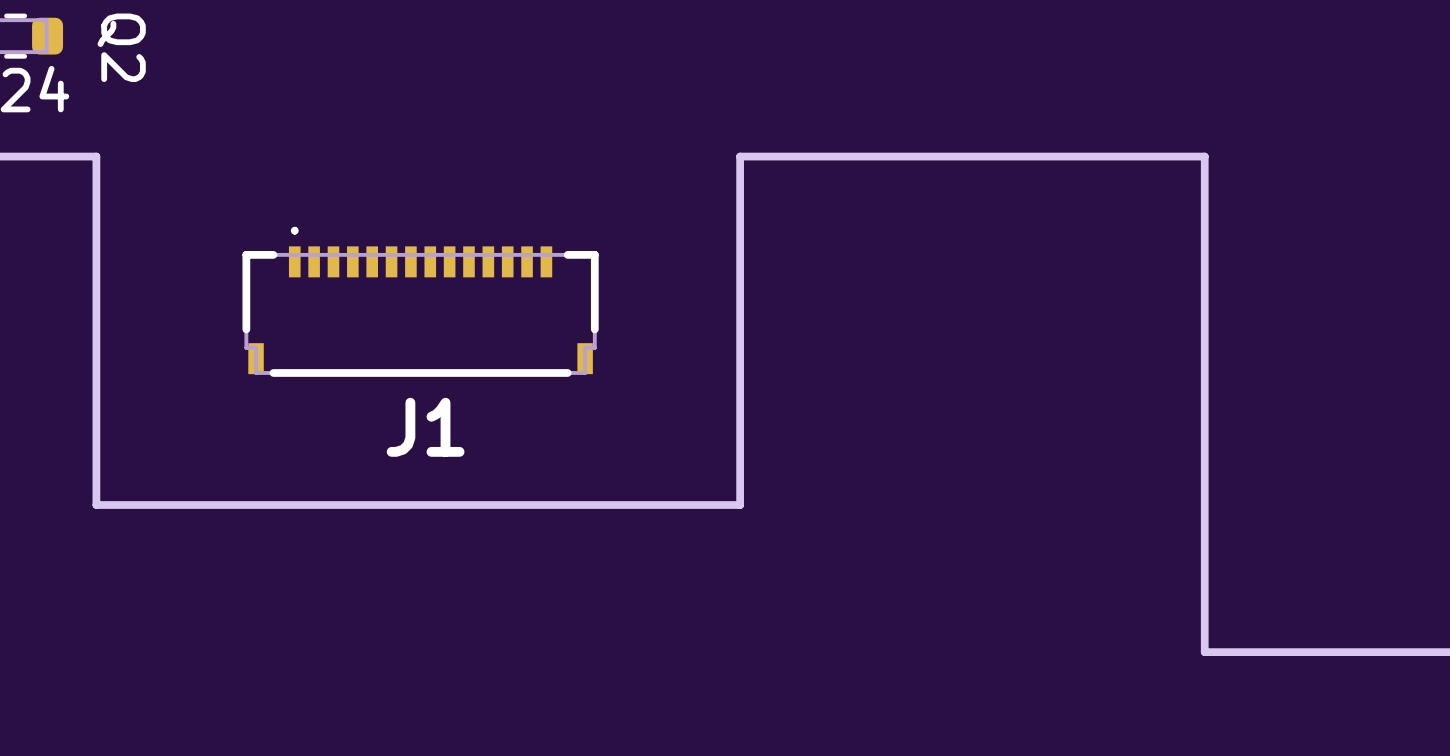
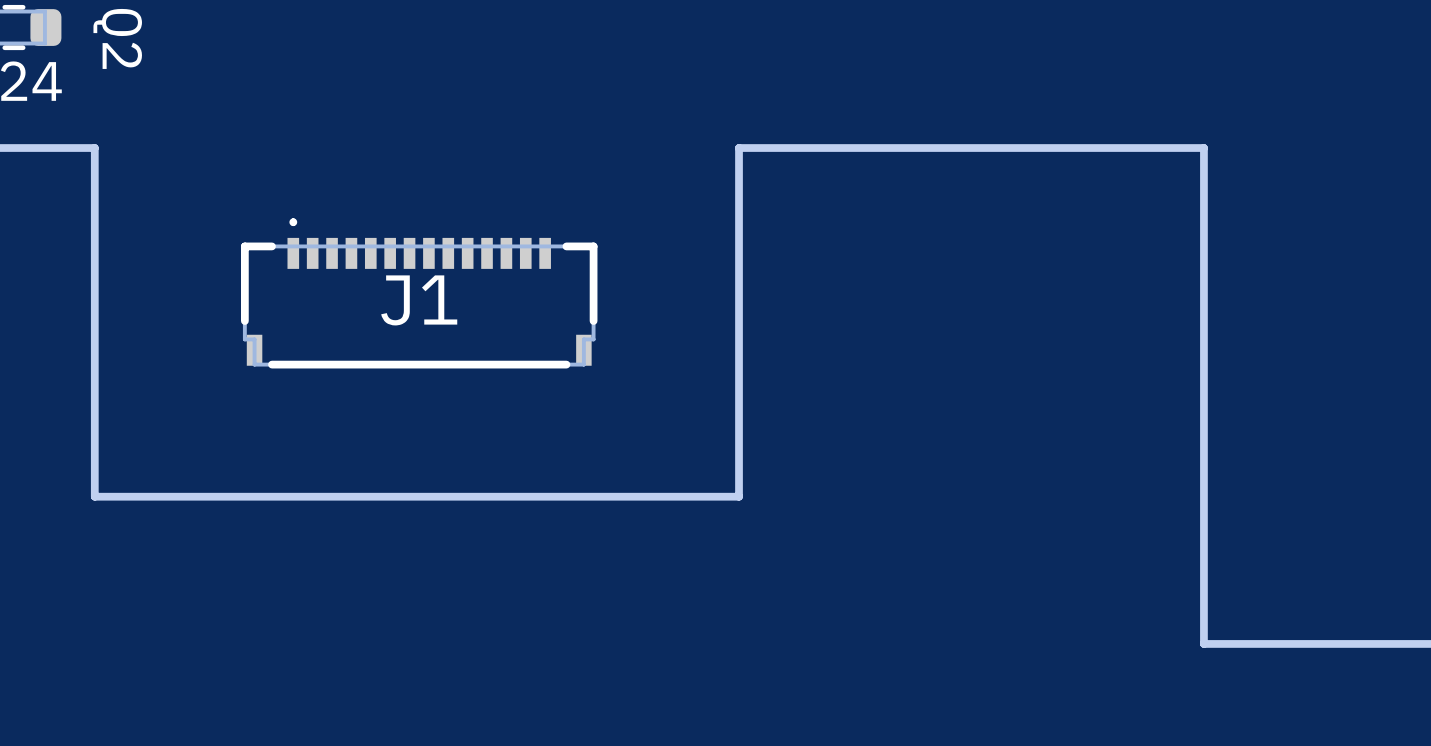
J1 name position: J1 (425, 427) -> J1 (419, 300)

